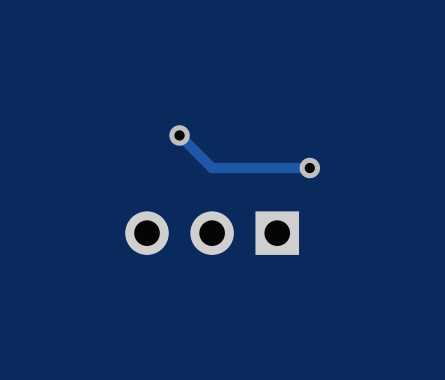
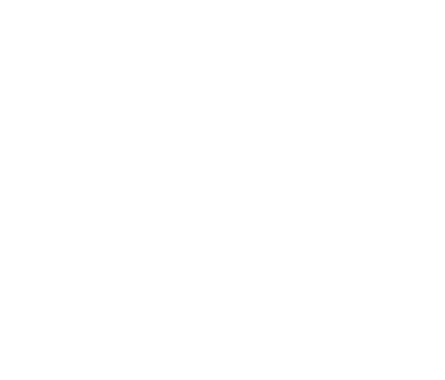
track: (179, 135) (212, 168) (309, 168) -> none
via: (179, 135) -> none
via: (309, 168) -> none
part: (212, 233) -> none

